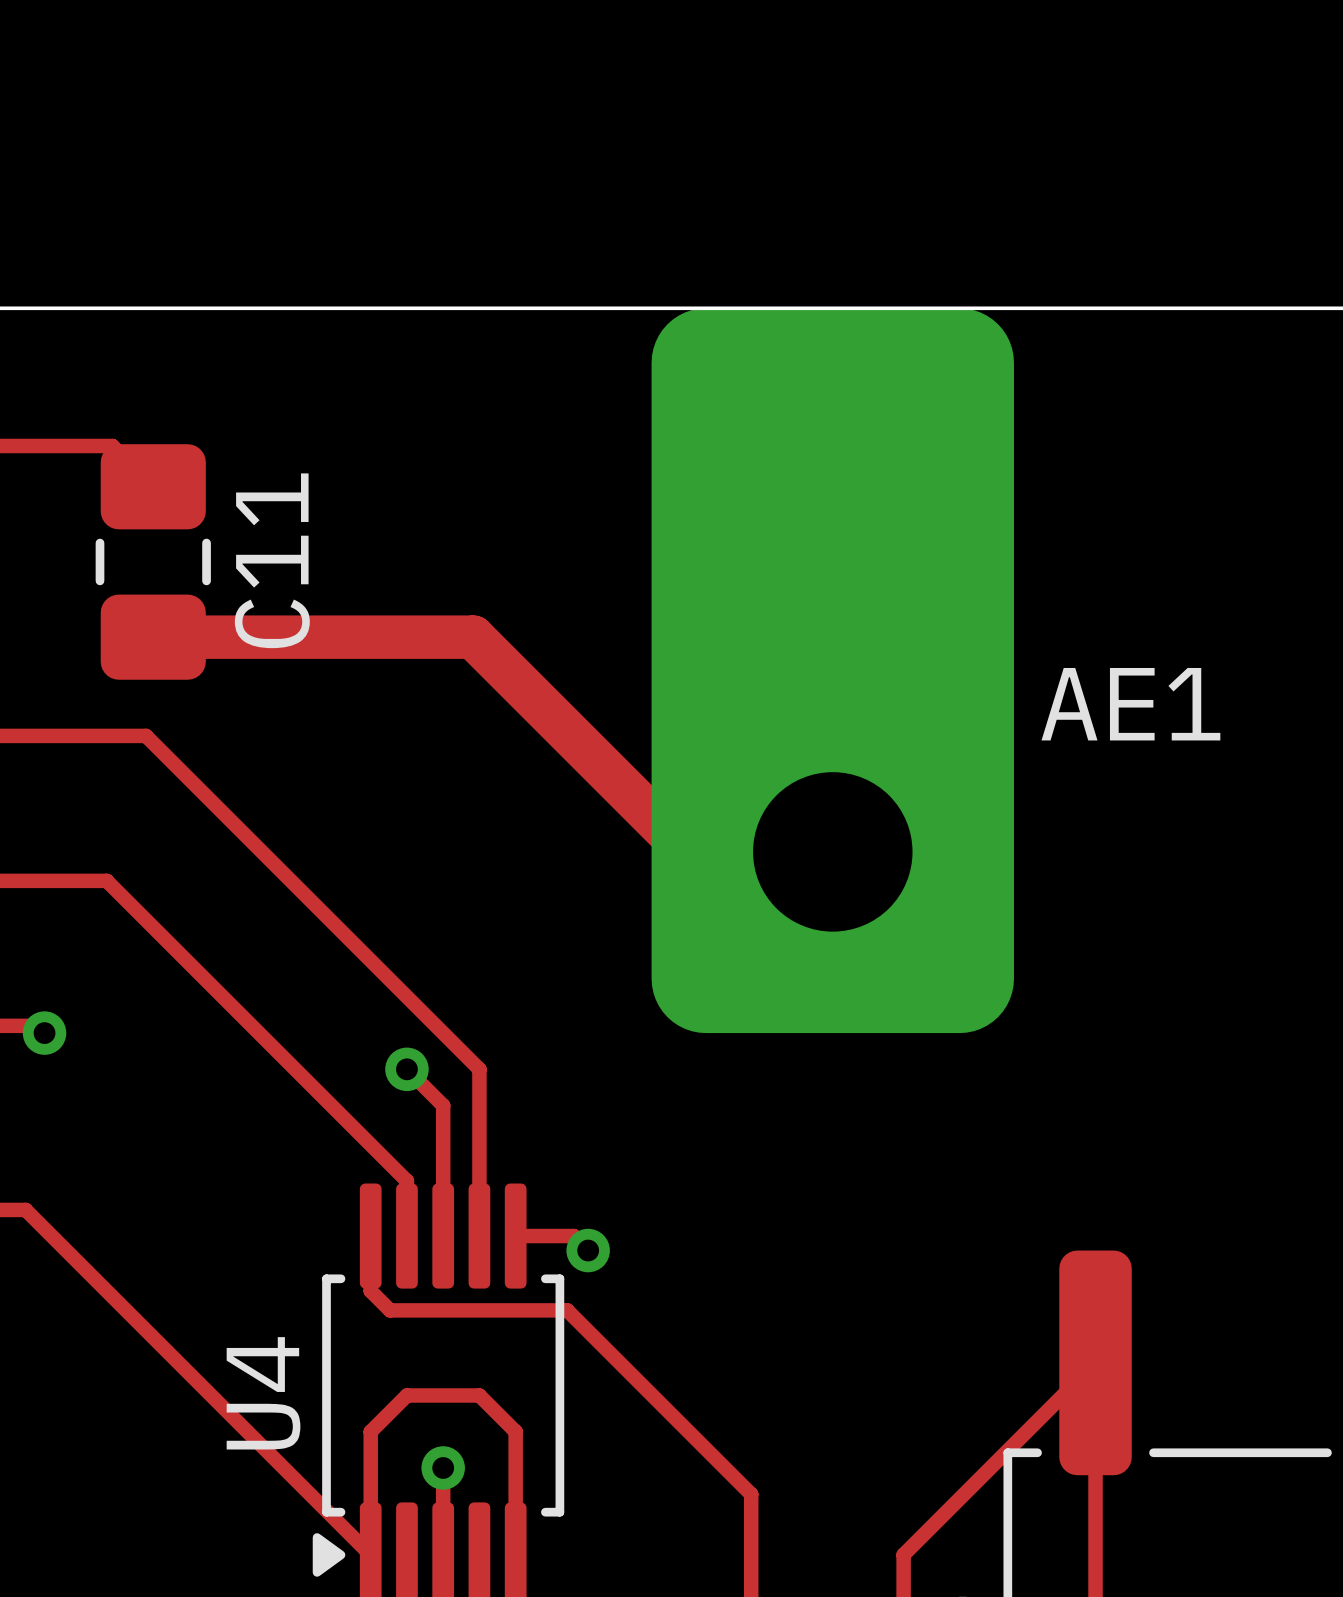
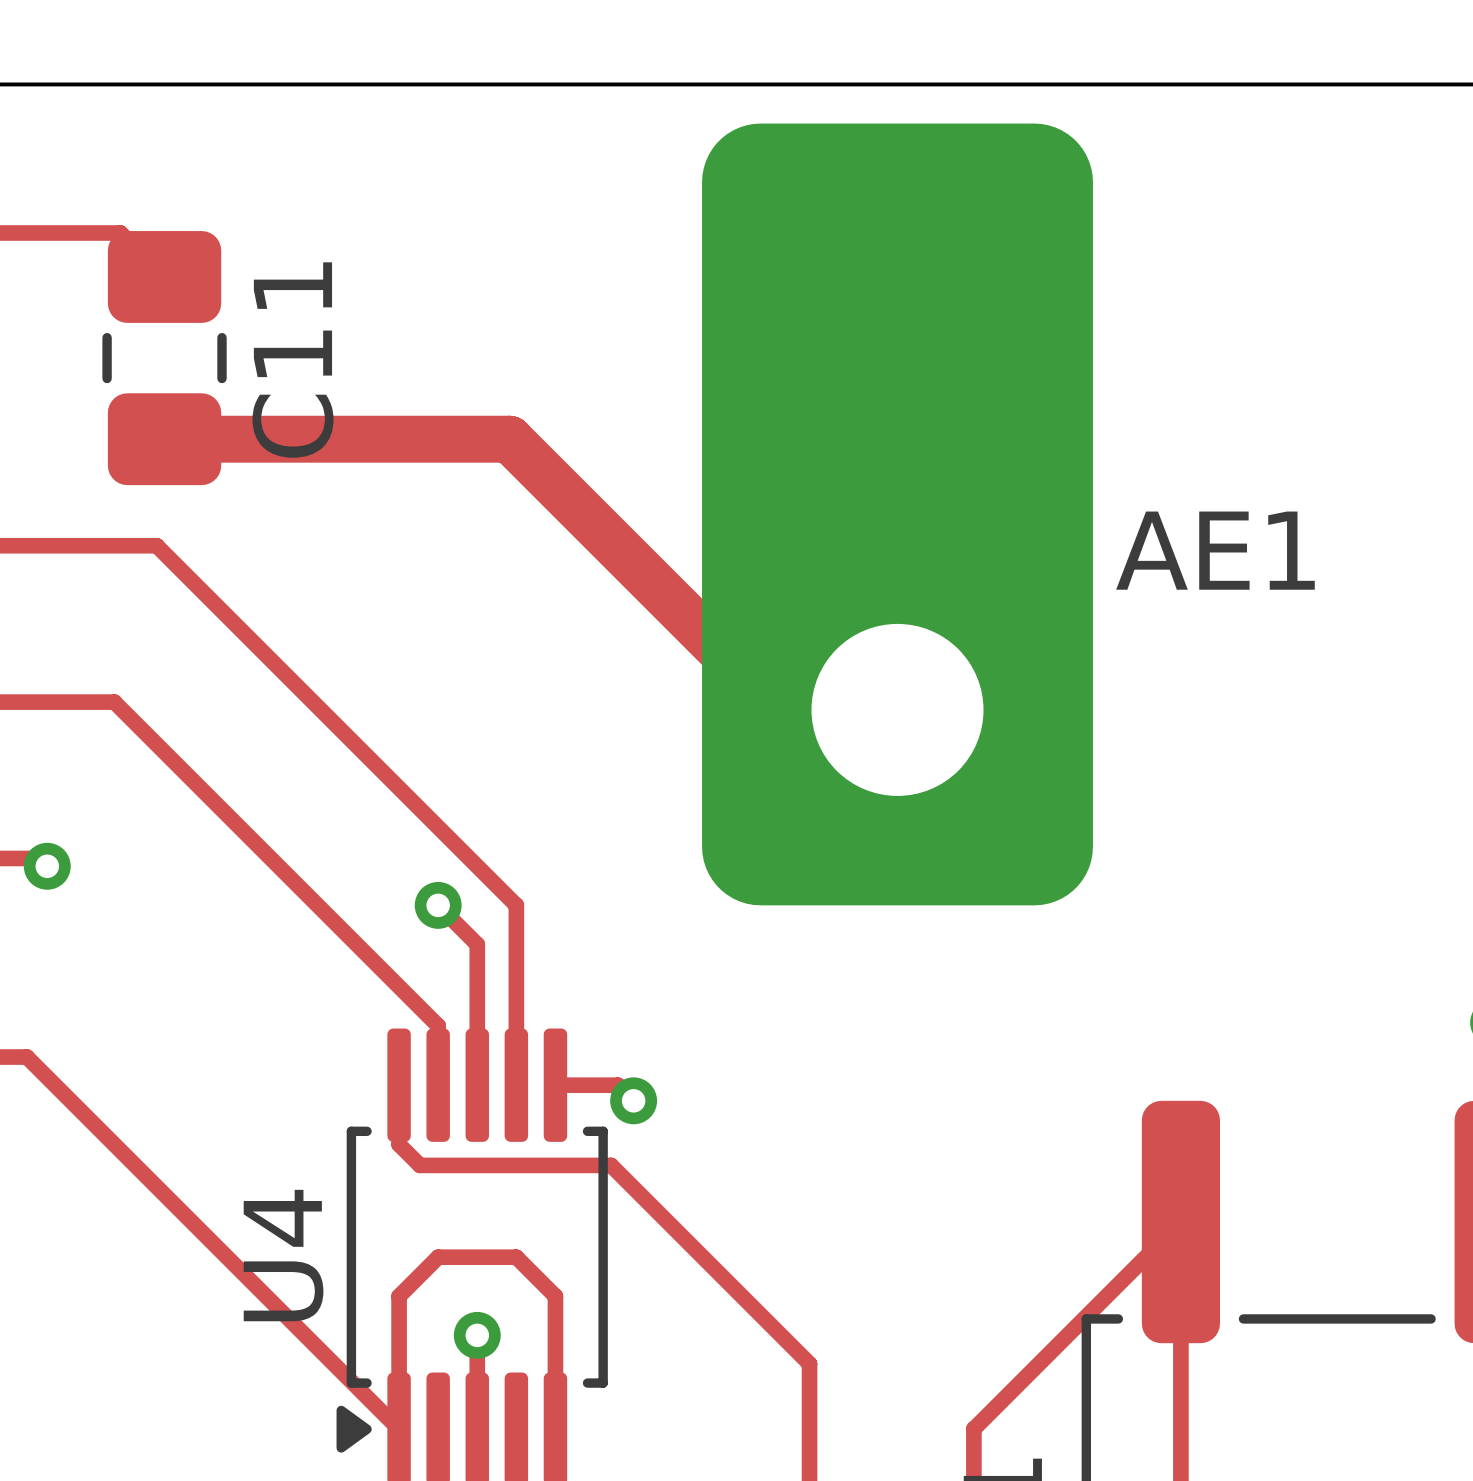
AE1 position: (832, 670) -> (897, 514)

